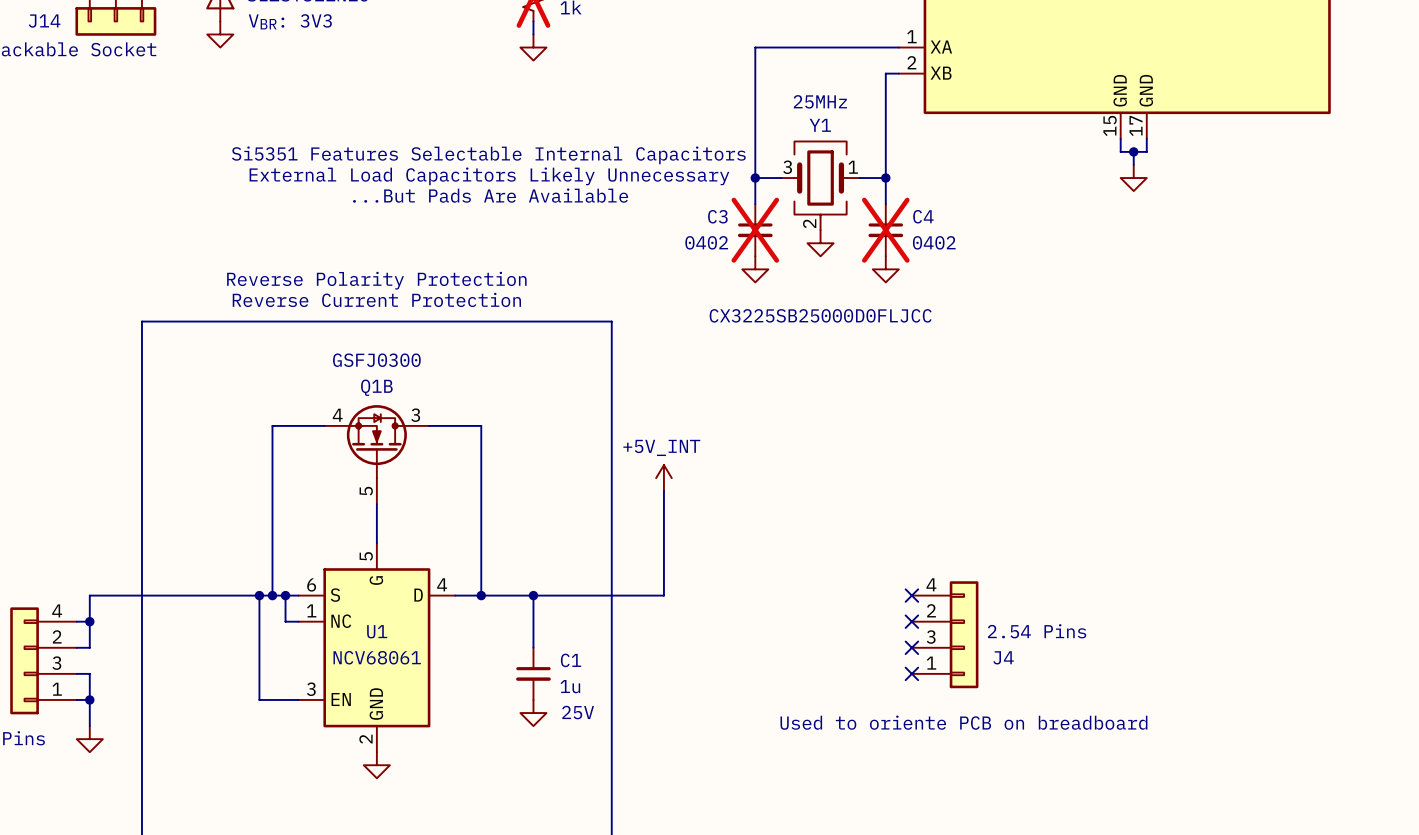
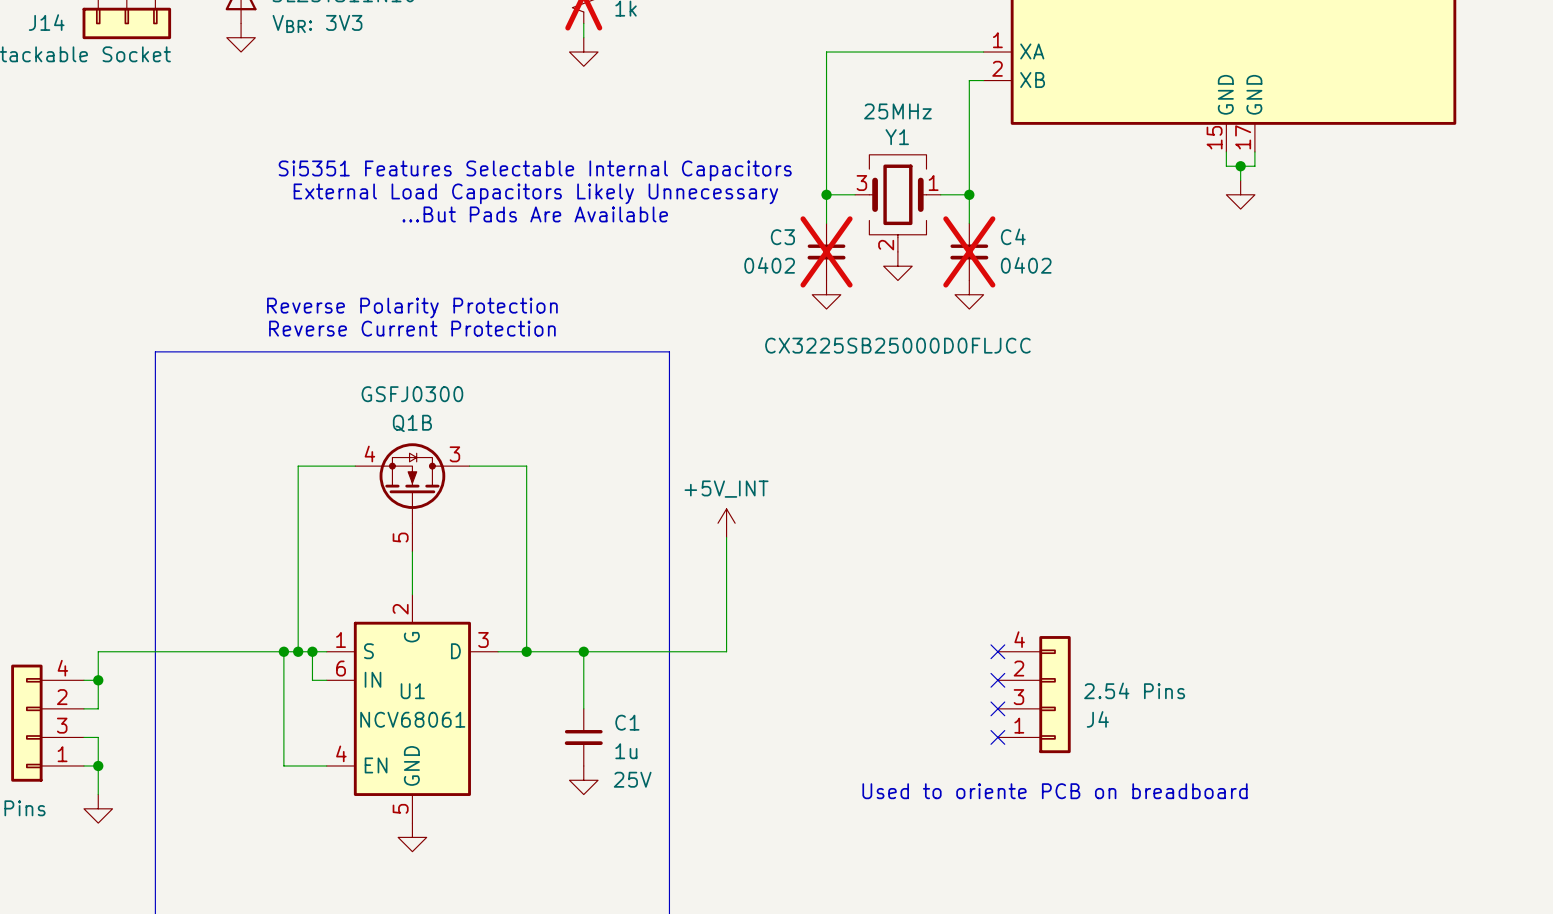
U1 pin number: 5 (366, 556) -> 2 (400, 609)
U1 pin number: 6 (311, 584) -> 1 (341, 639)
U1 pin number: 4 (442, 584) -> 3 (483, 639)
U1 pin number: 1 (311, 610) -> 6 (341, 668)
U1 pin name: NC (341, 621) -> IN (373, 679)
U1 pin number: 3 (311, 689) -> 4 (341, 753)
U1 pin number: 2 (366, 739) -> 5 (400, 808)

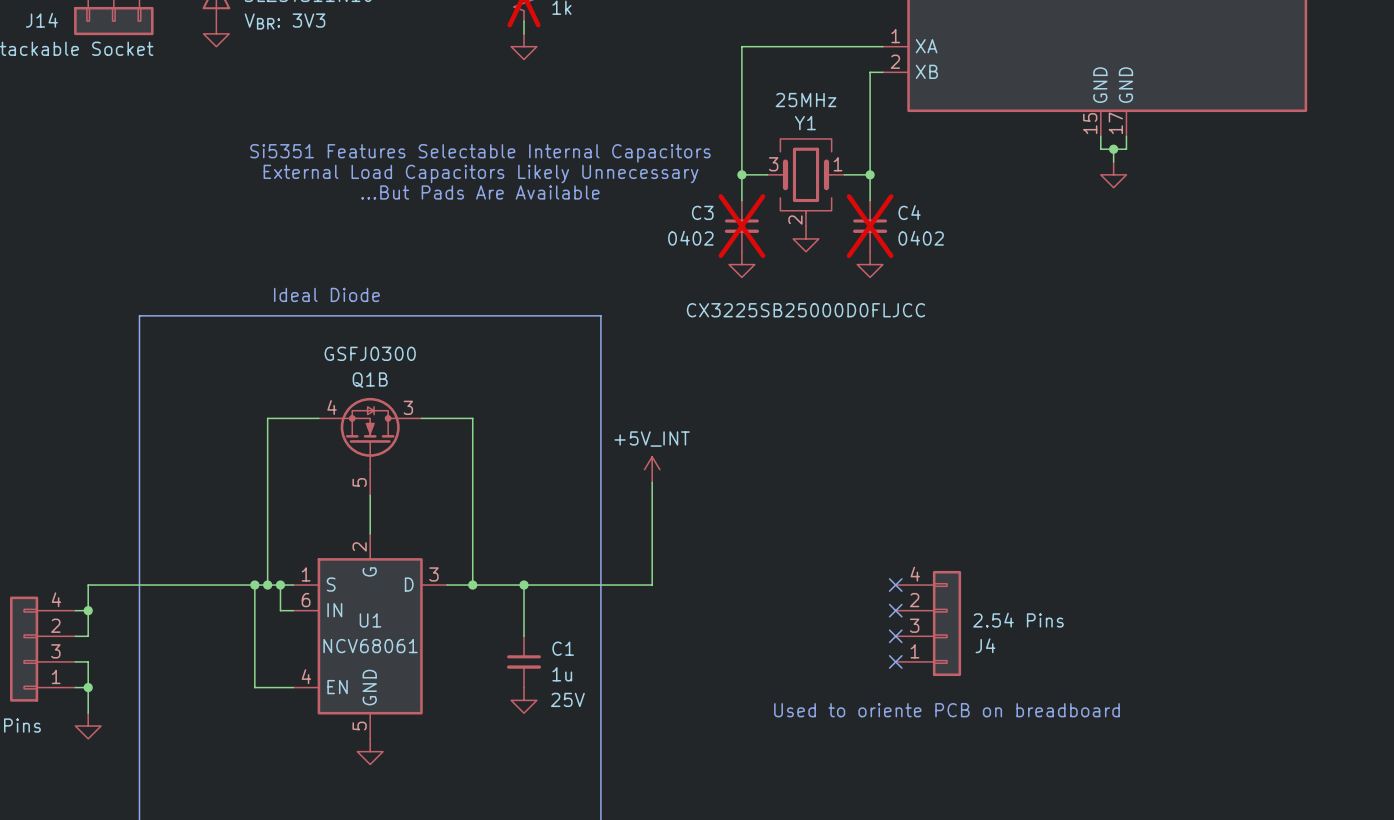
text: Reverse Polarity Protection (412, 308) -> none
text: none -> Ideal Diode (326, 294)
text: Reverse Current Protection (412, 328) -> none

